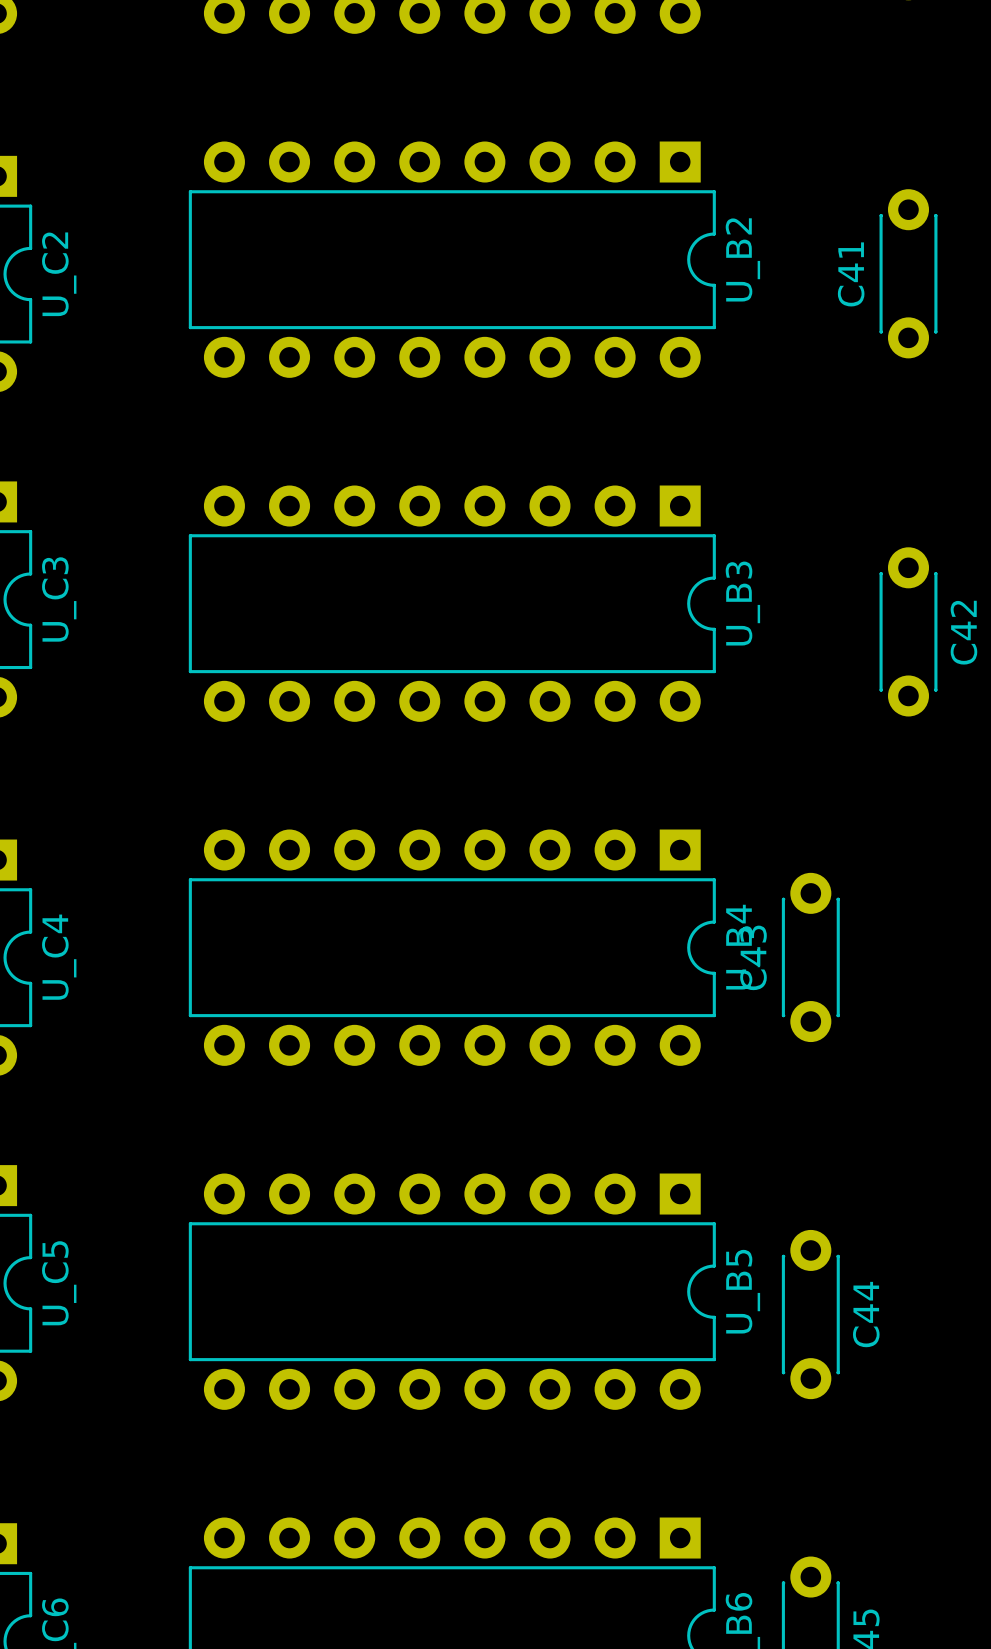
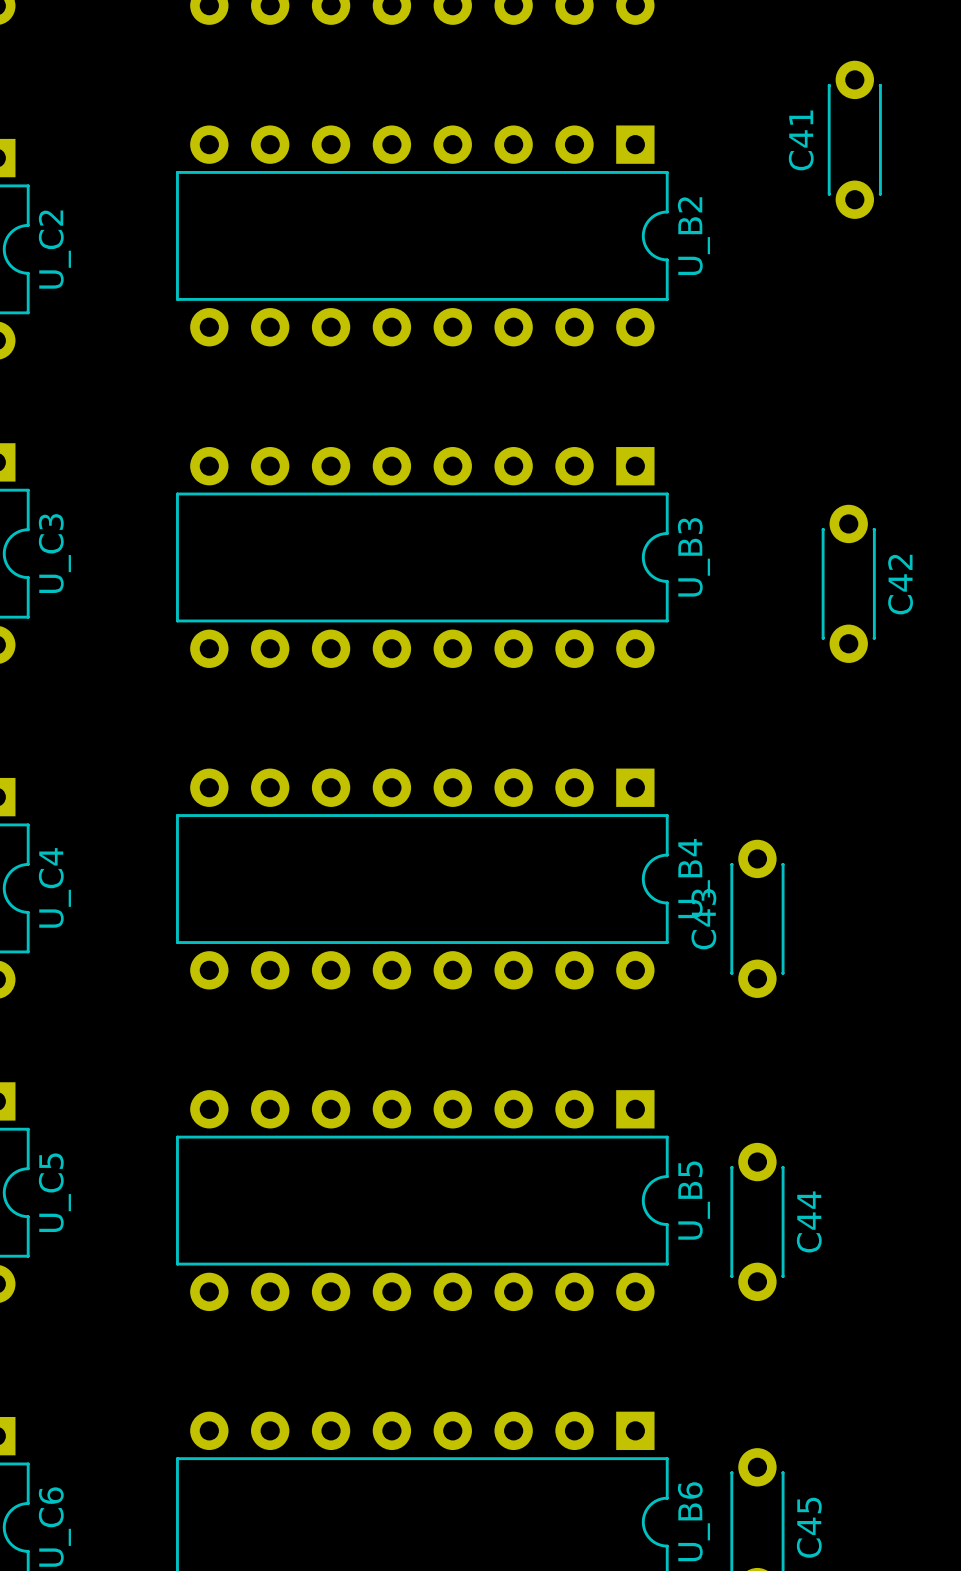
C41 position: (908, 273) -> (854, 139)
C43 position: (810, 957) -> (757, 918)

